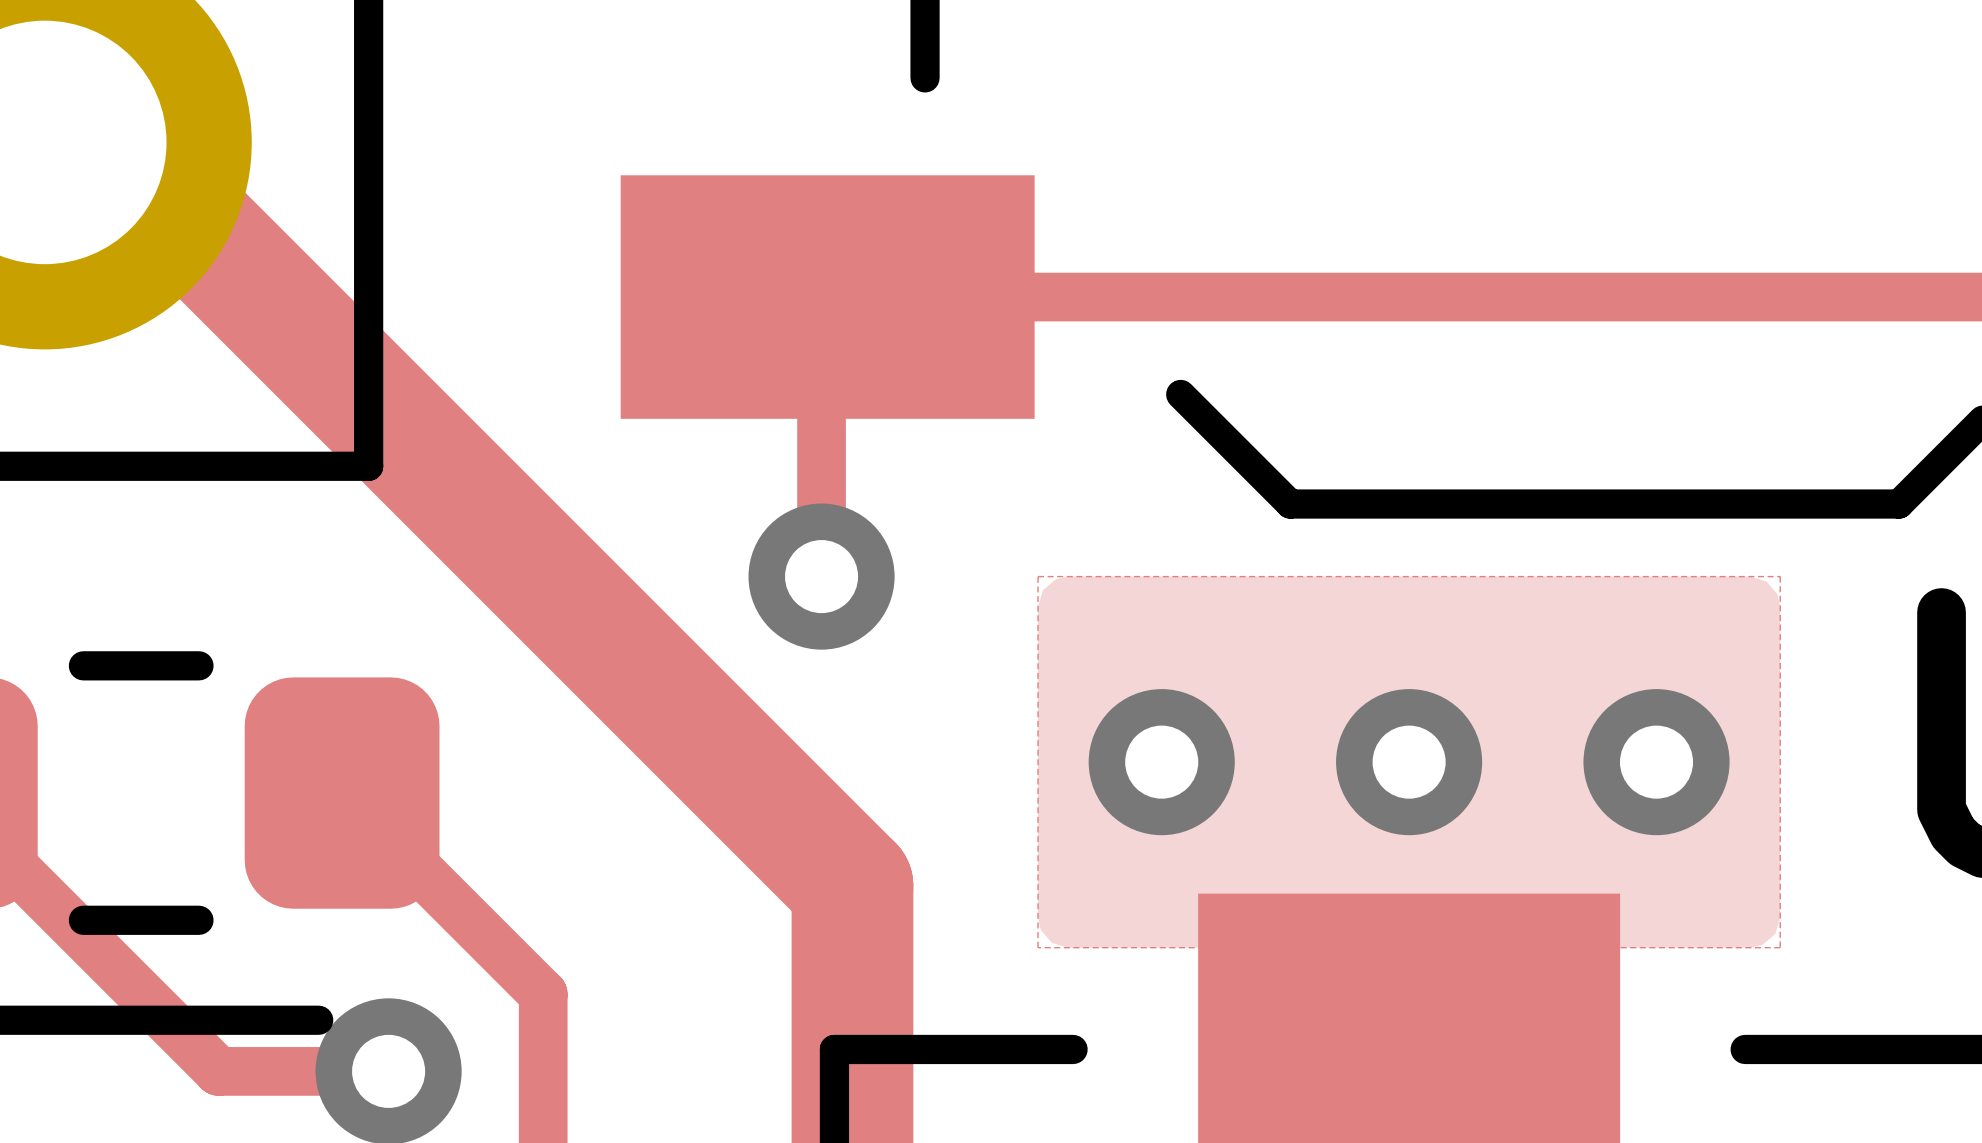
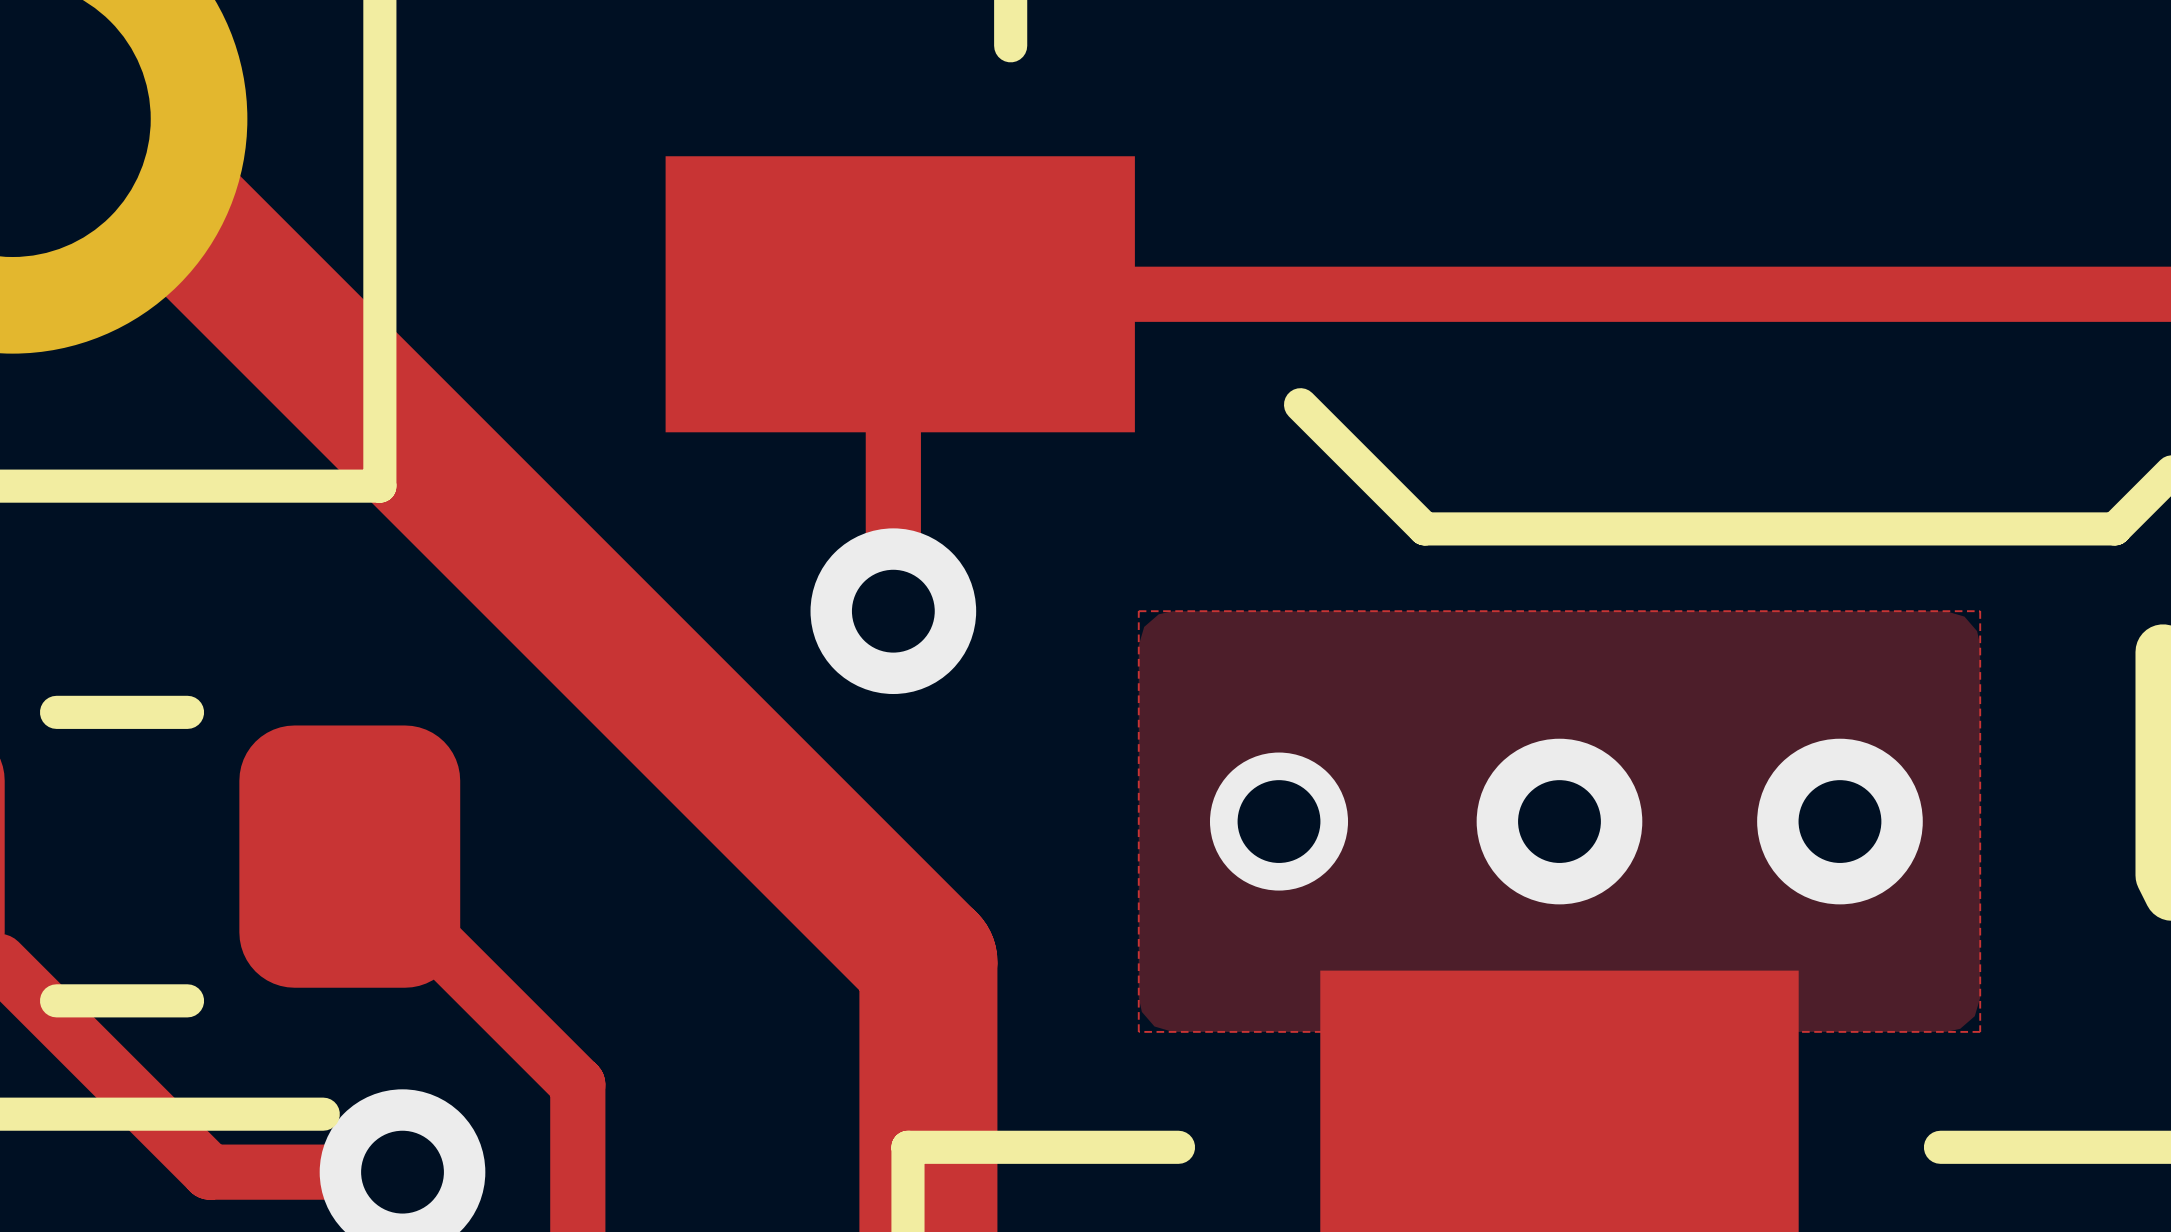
via size: [1088, 689, 1235, 836] -> [1209, 752, 1349, 891]

